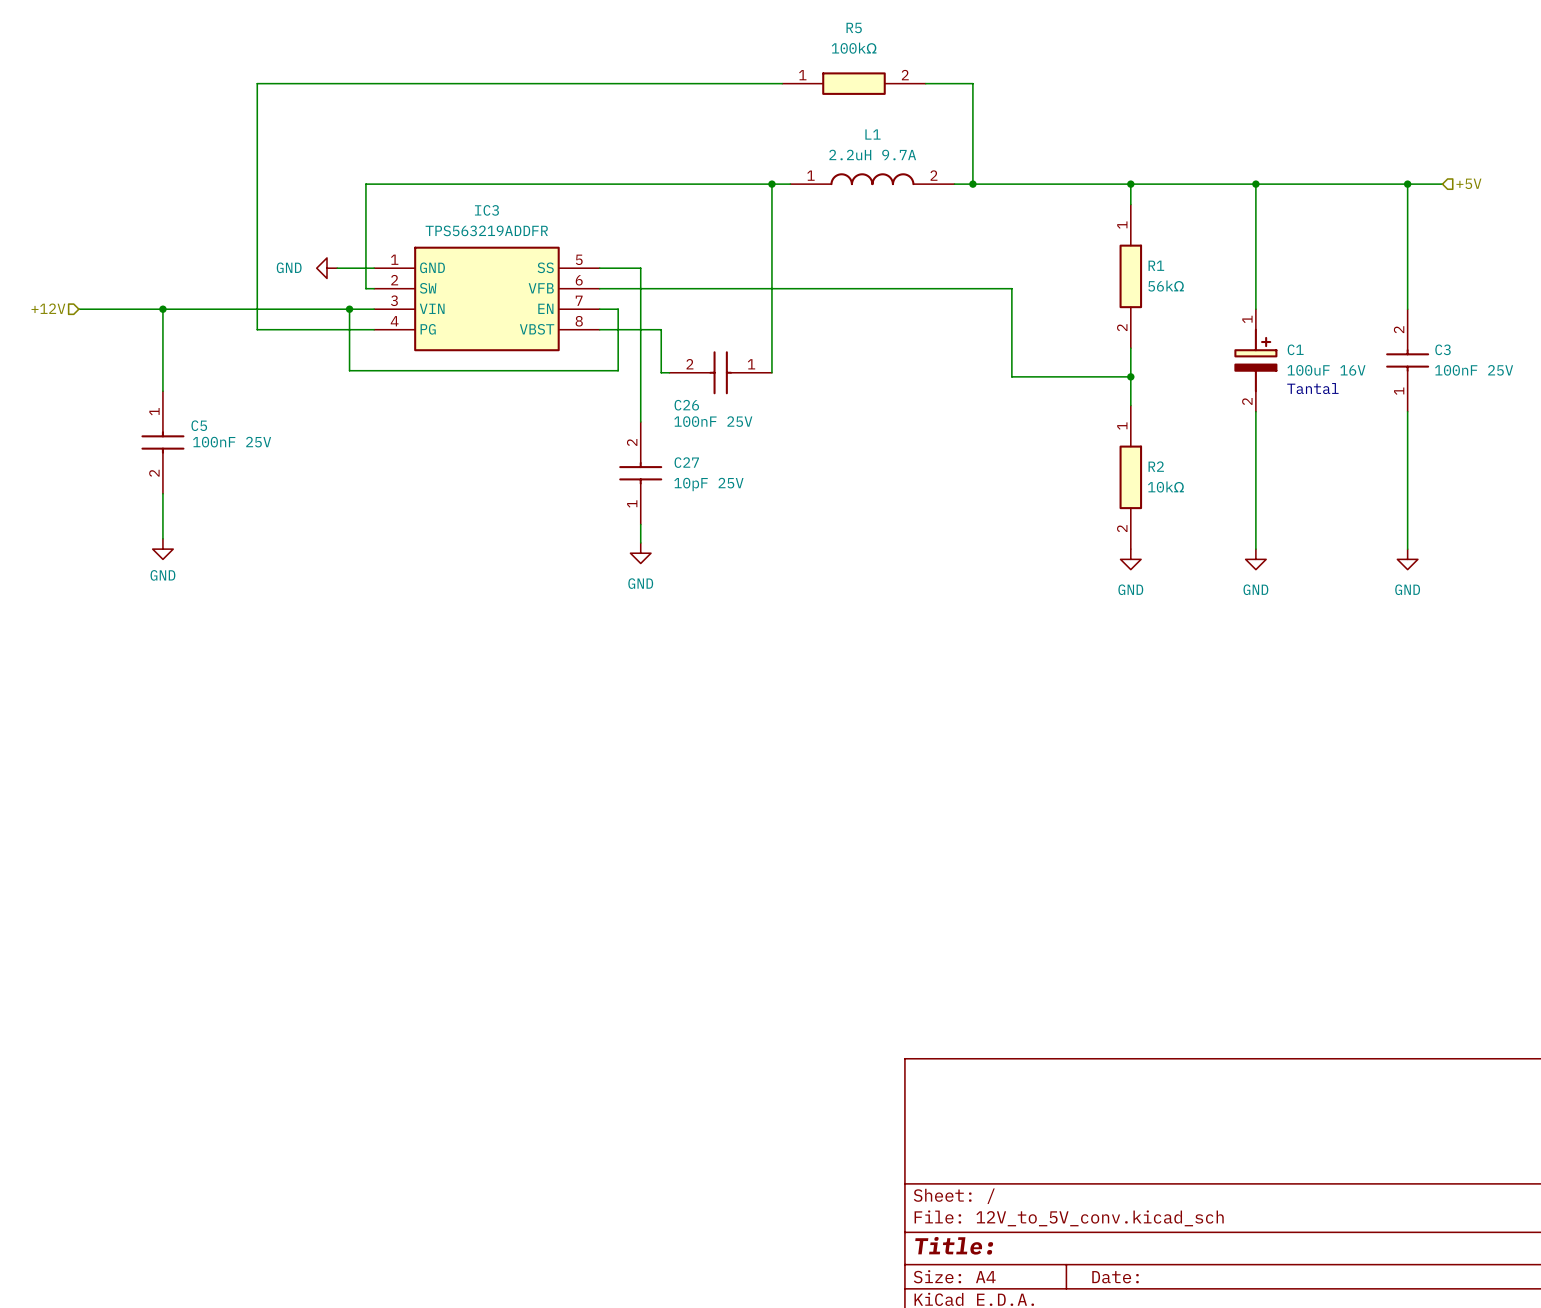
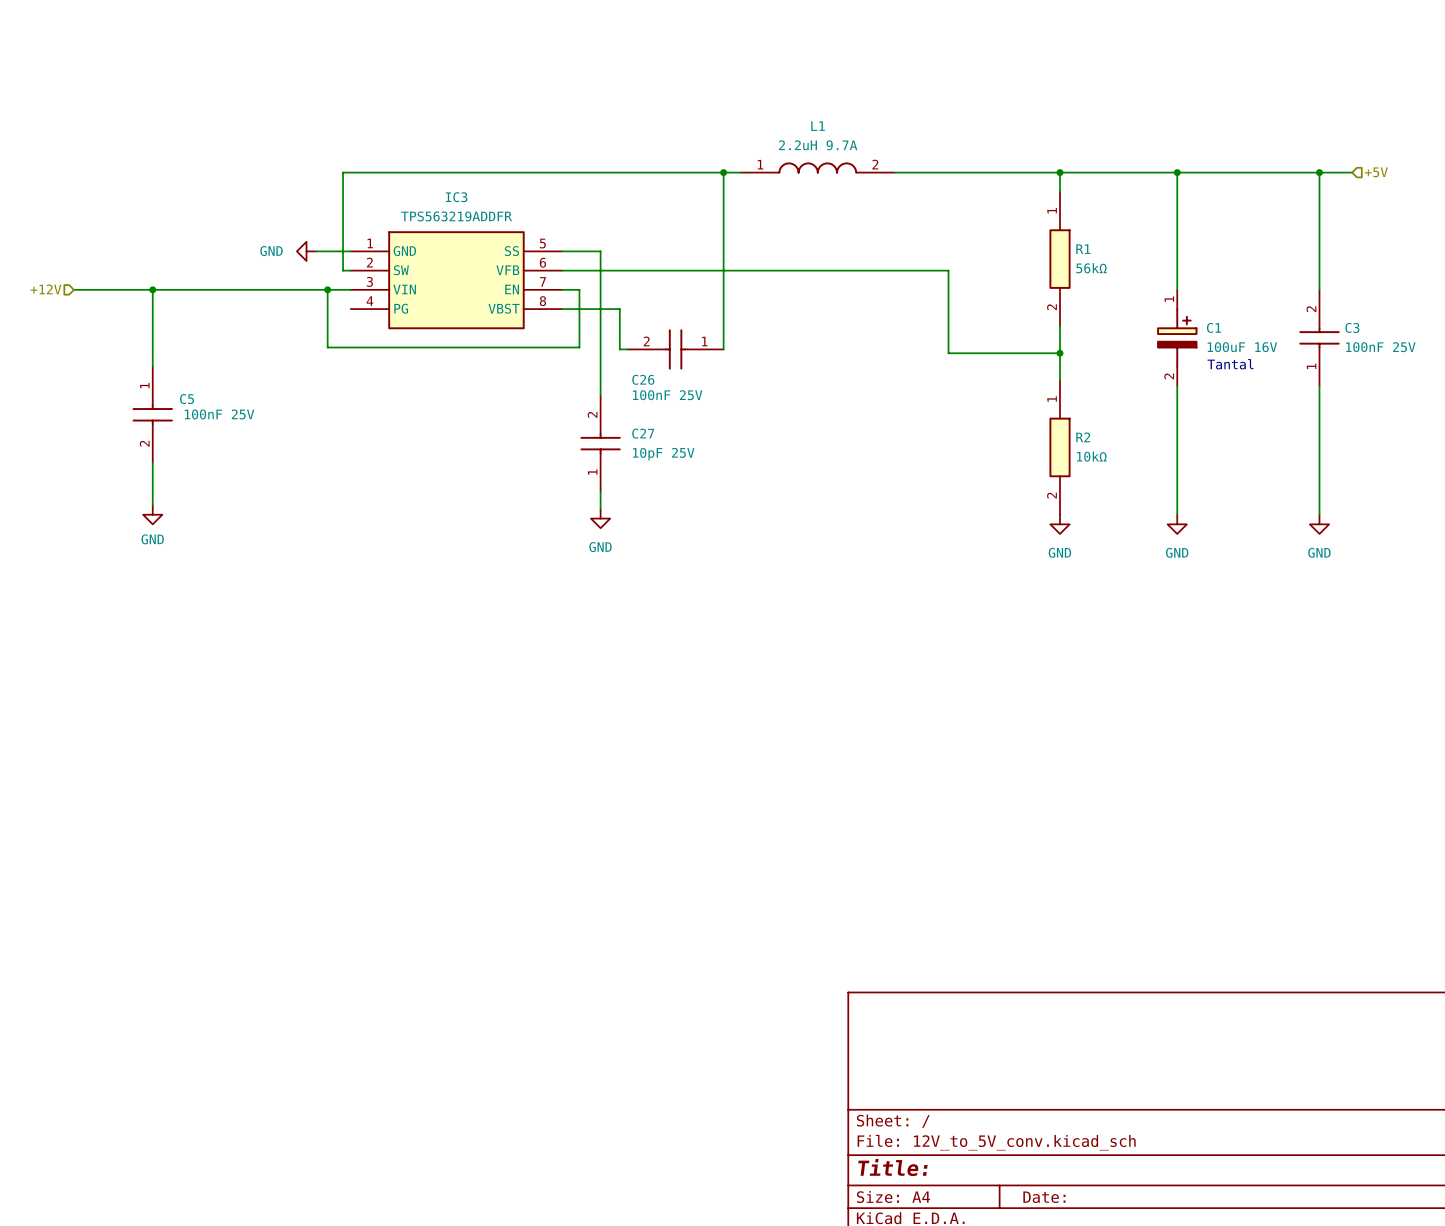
wire: (782, 83) (257, 83) (257, 329) (374, 329) -> none
R5: 100kΩ (853, 83) -> none
wire: (925, 83) (972, 83) (972, 184) -> none
junction: (972, 184) -> none

